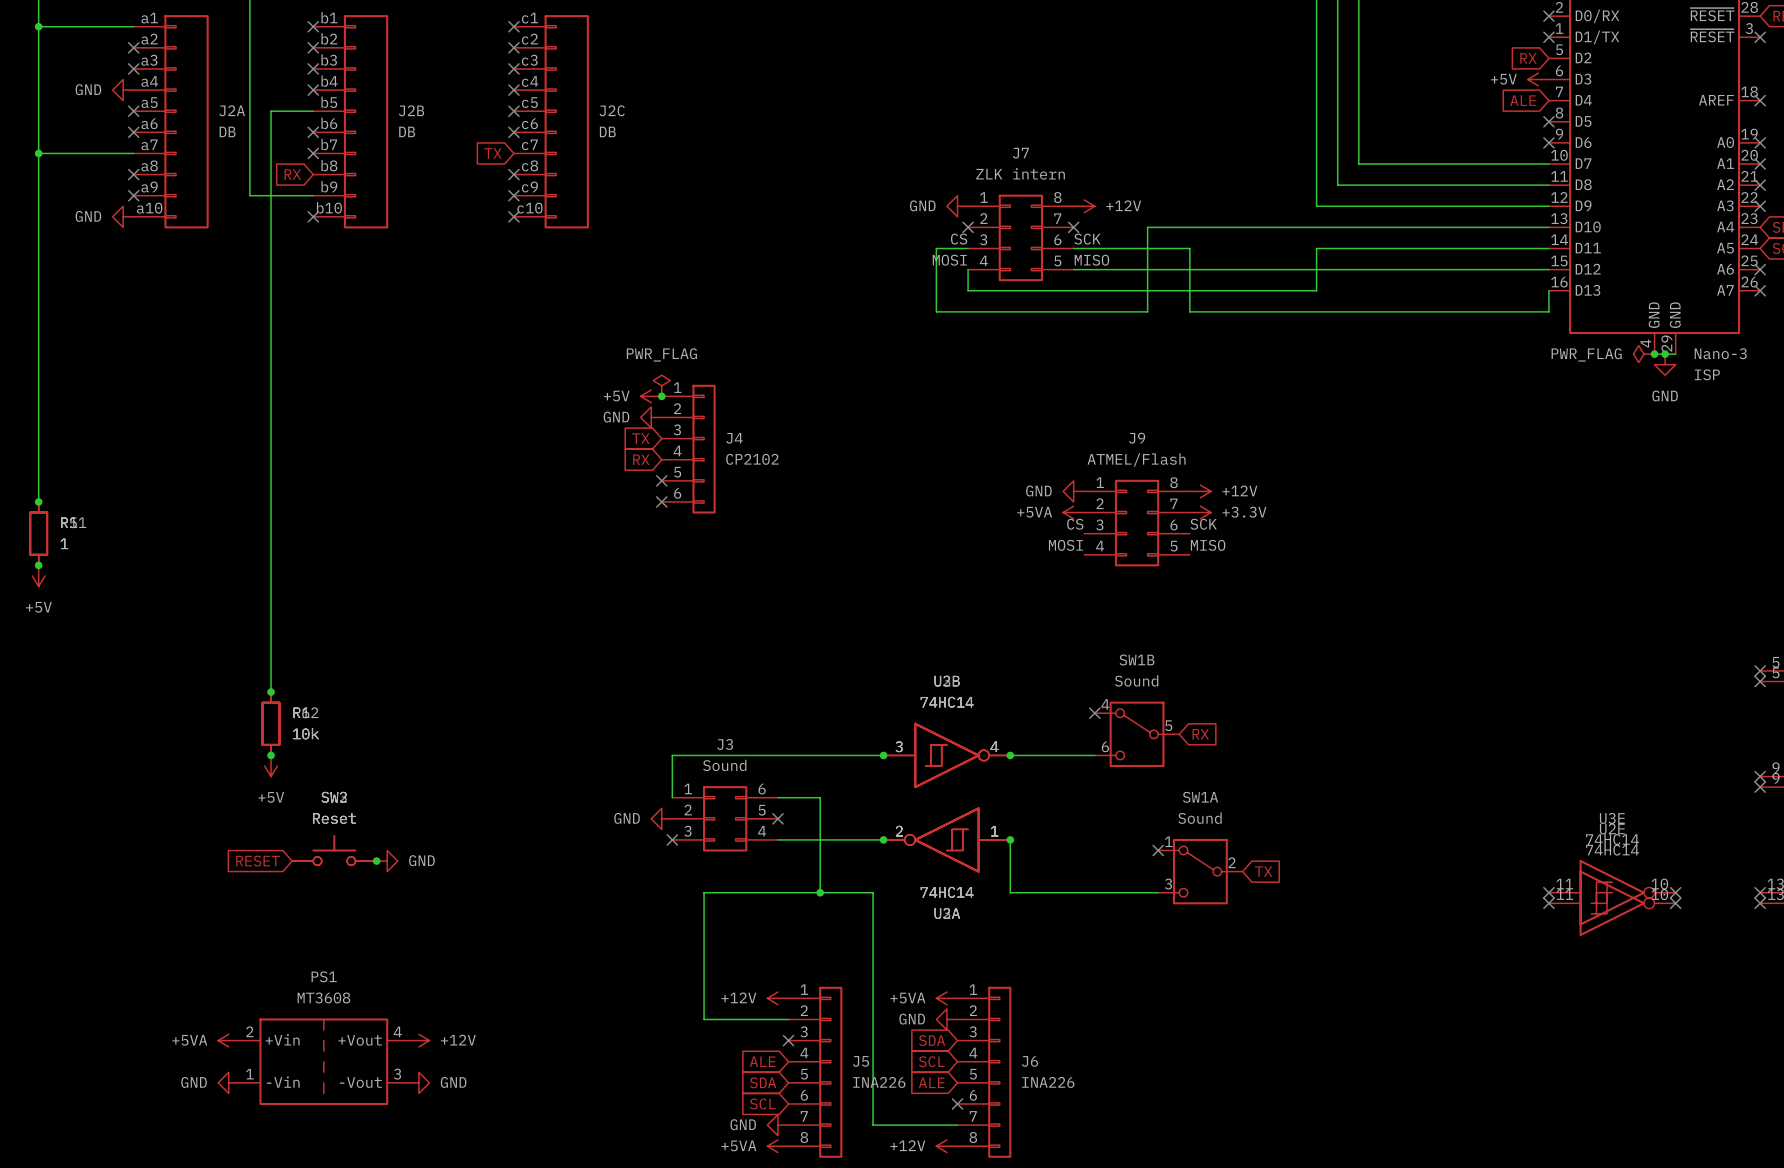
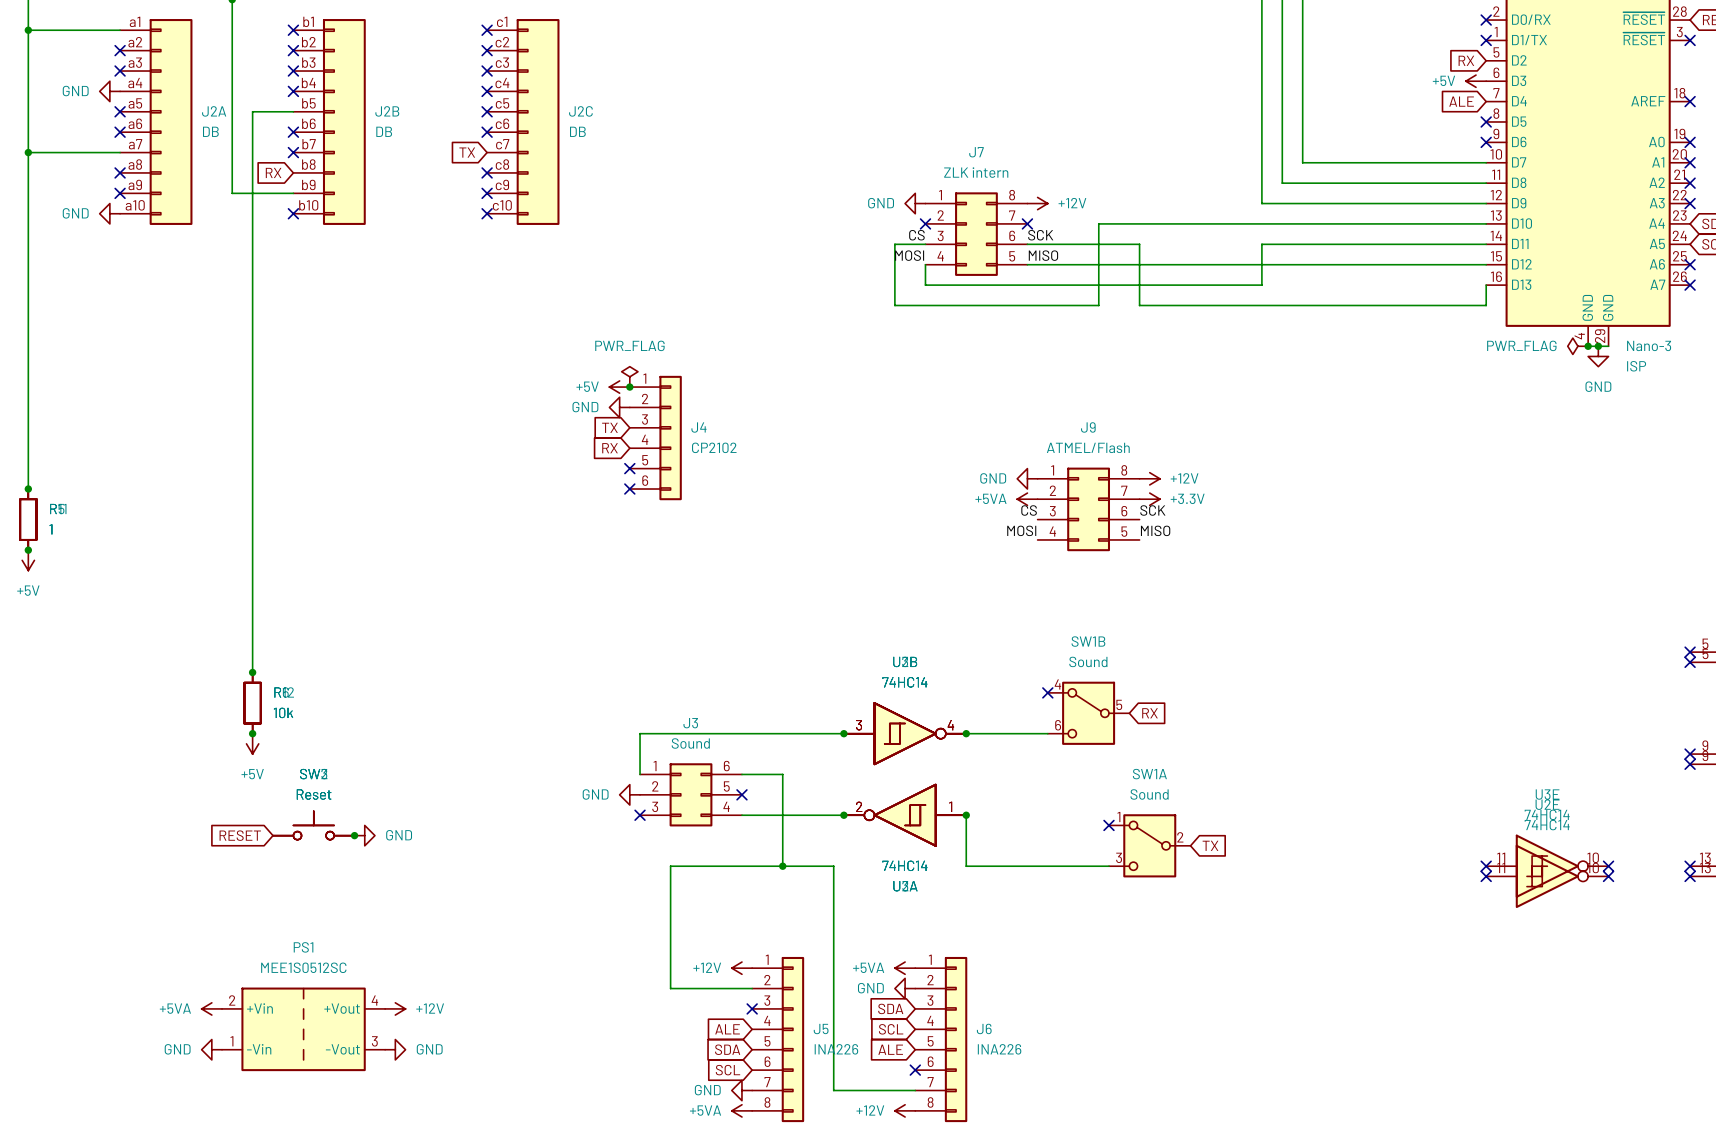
PS1 value: MT3608 (323, 997) -> MEE1S0512SC (303, 967)

